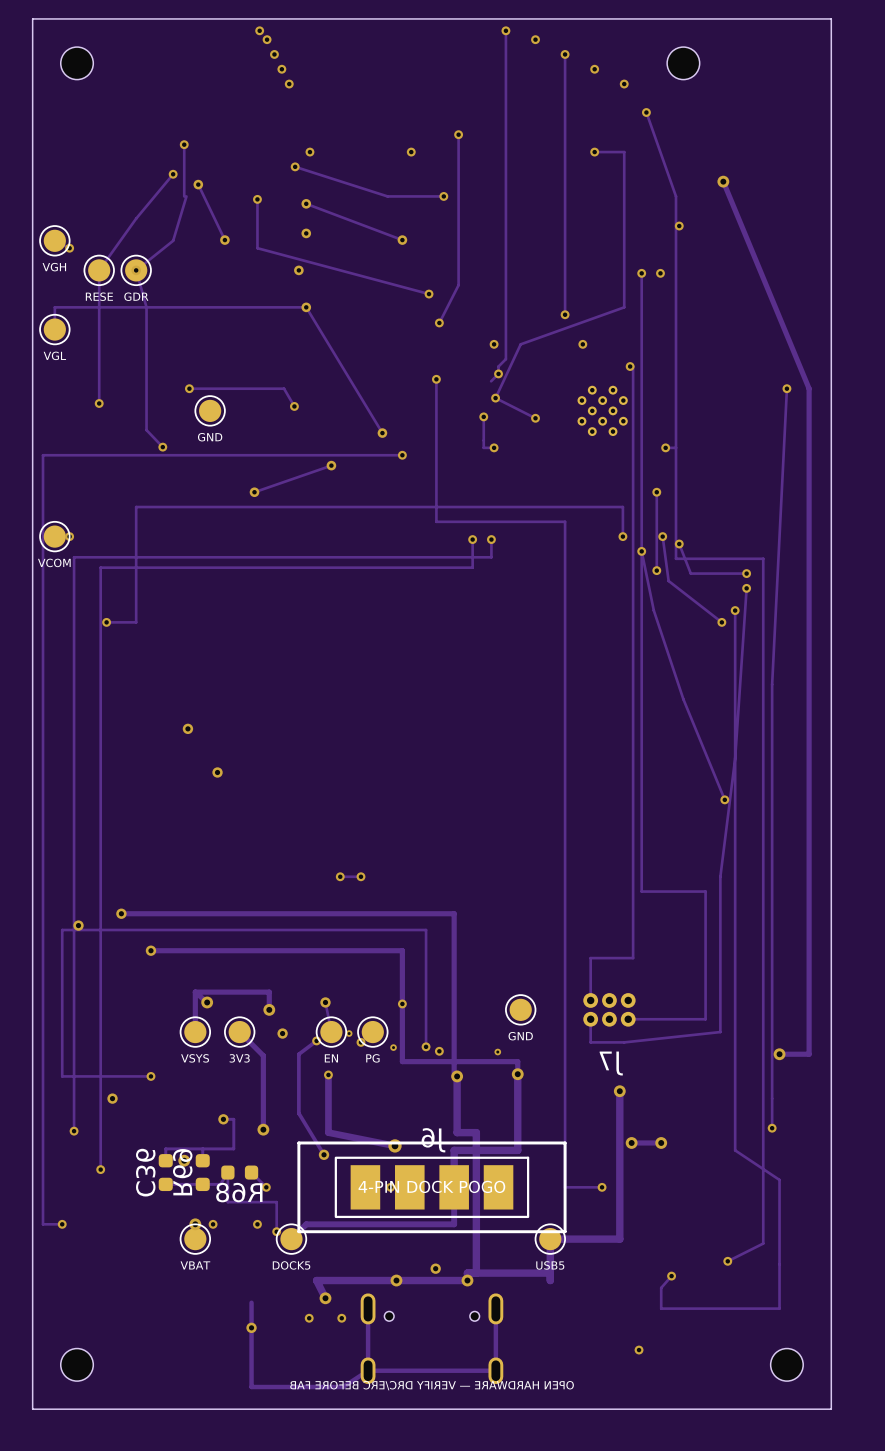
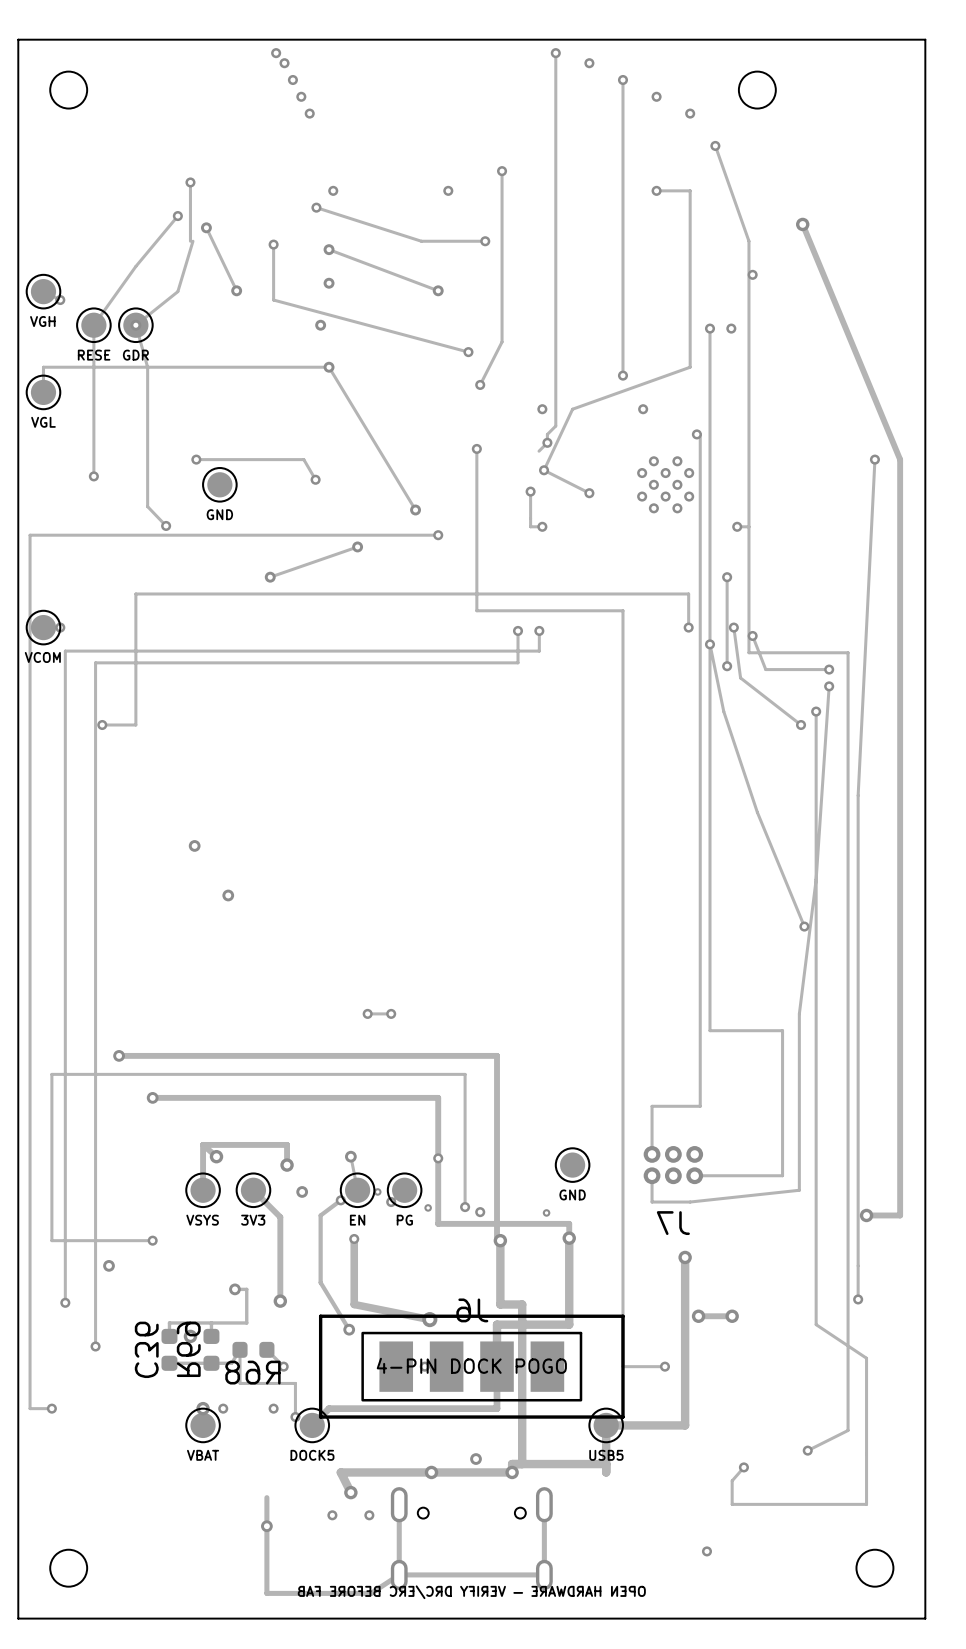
via: (78, 925) -> none

